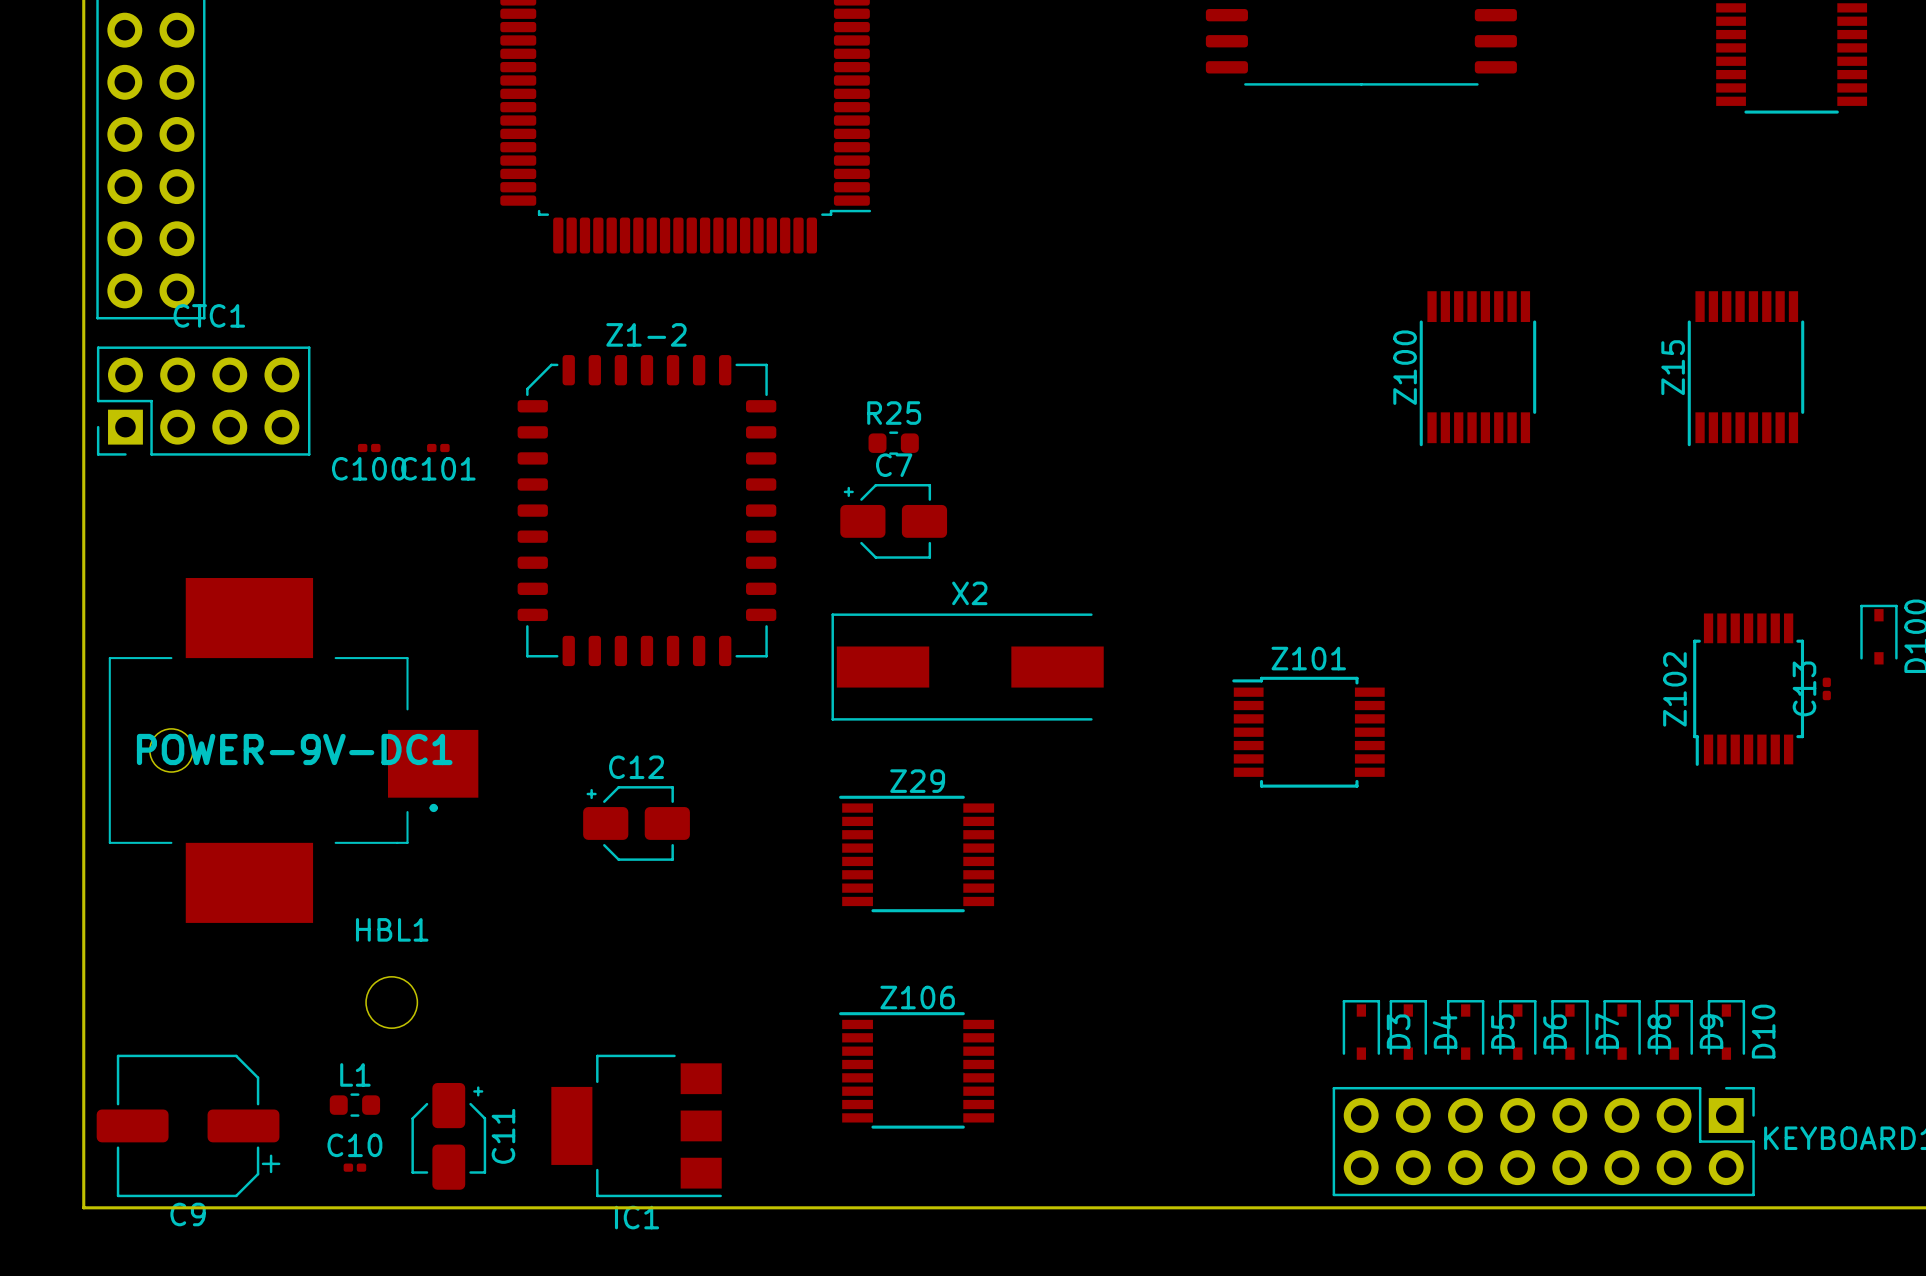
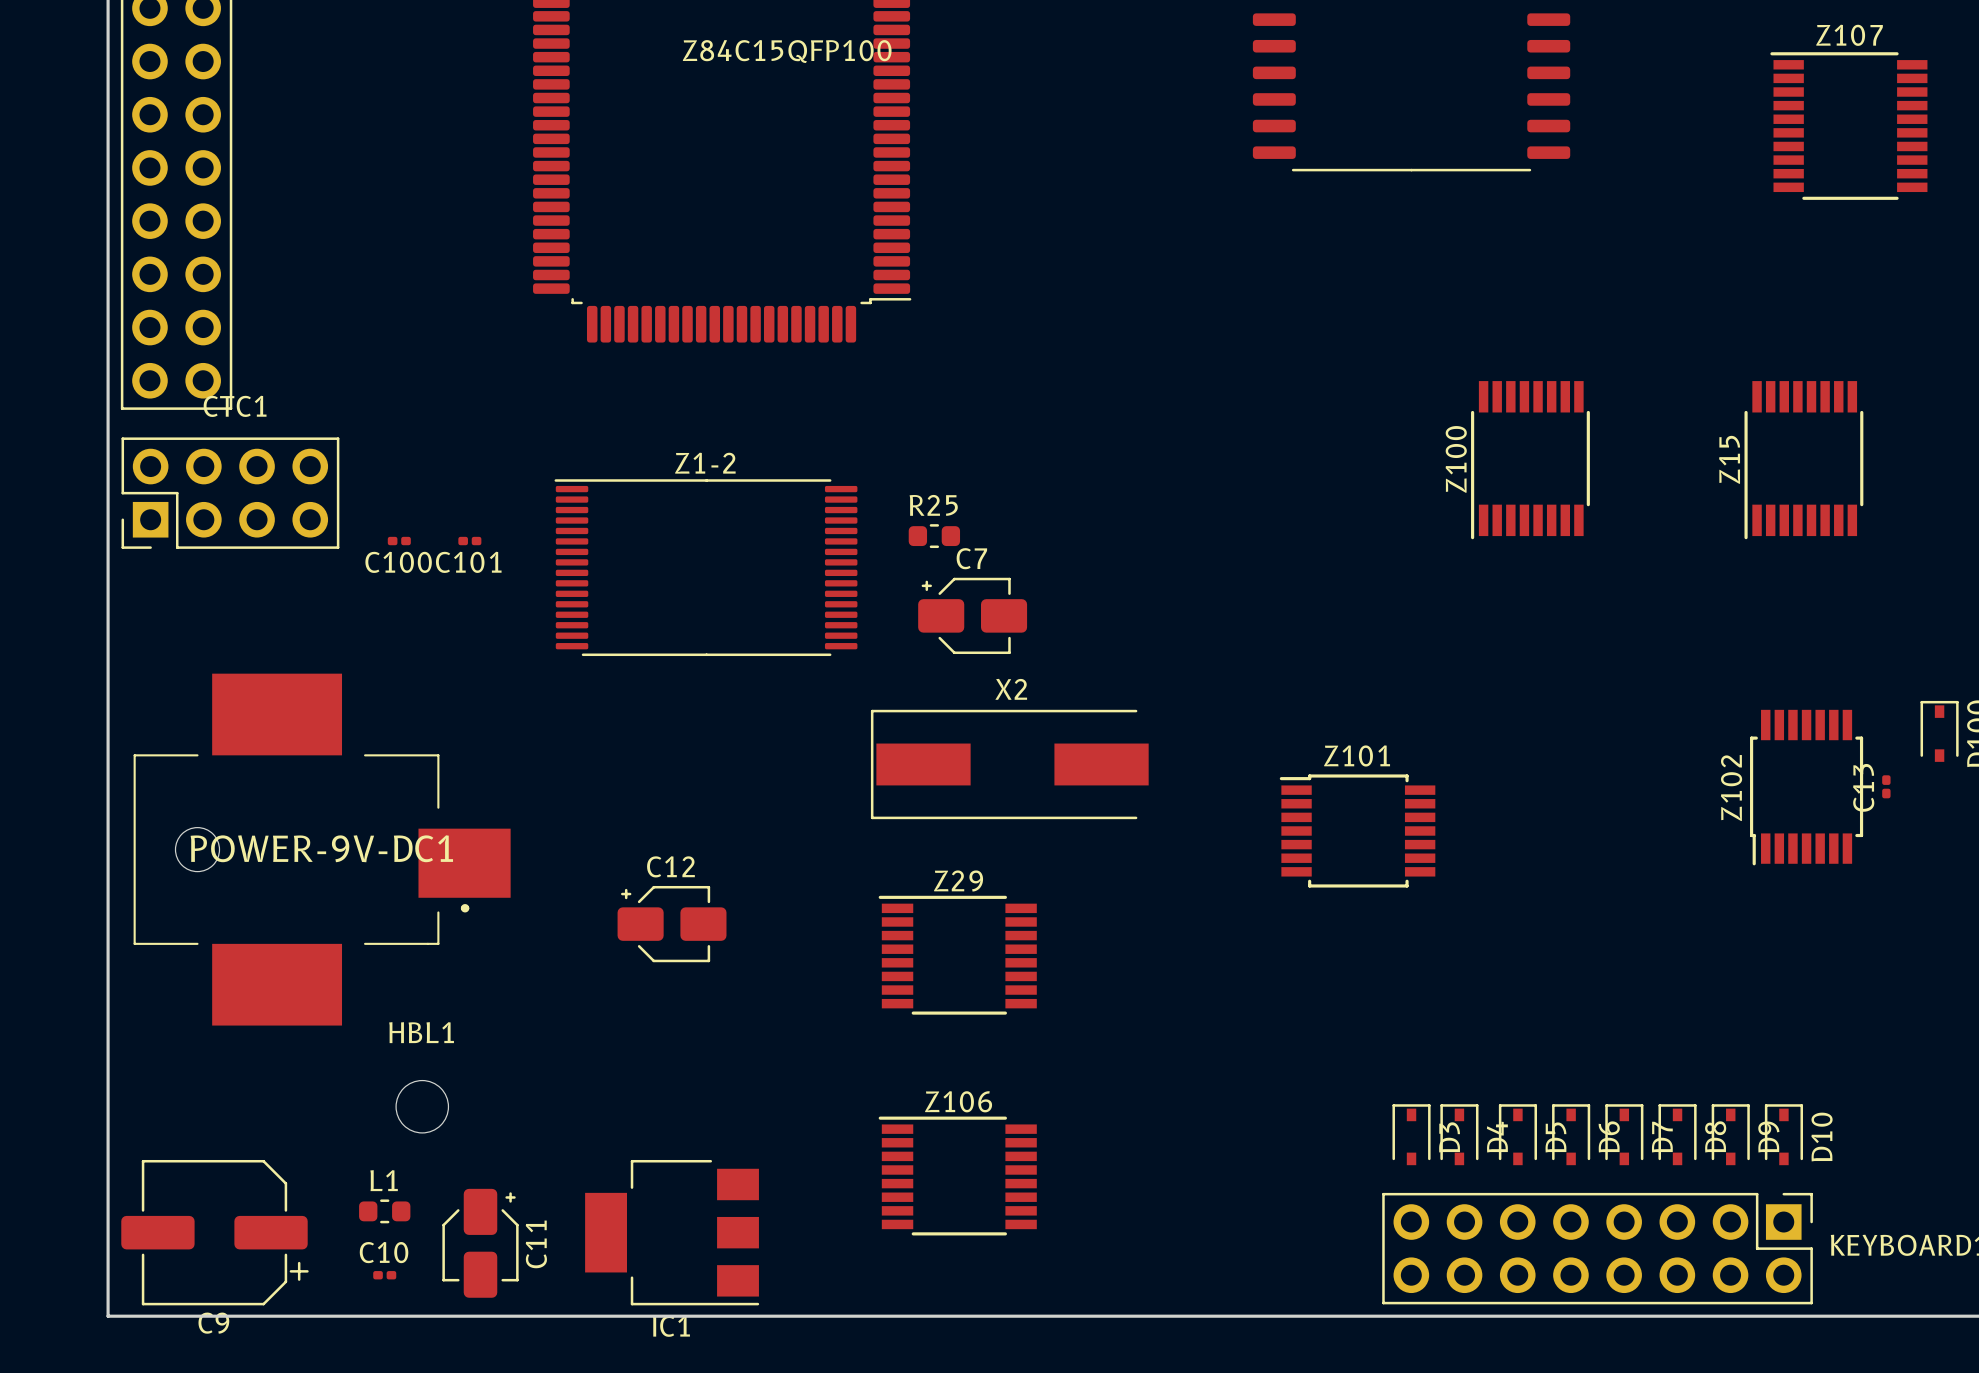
Z1-2 name position: Z1-2 (646, 334) -> Z1-2 (705, 463)
Z1-2 footprint: [517, 355, 777, 667] -> [554, 479, 858, 657]
C7 position: (893, 521) -> (972, 615)

